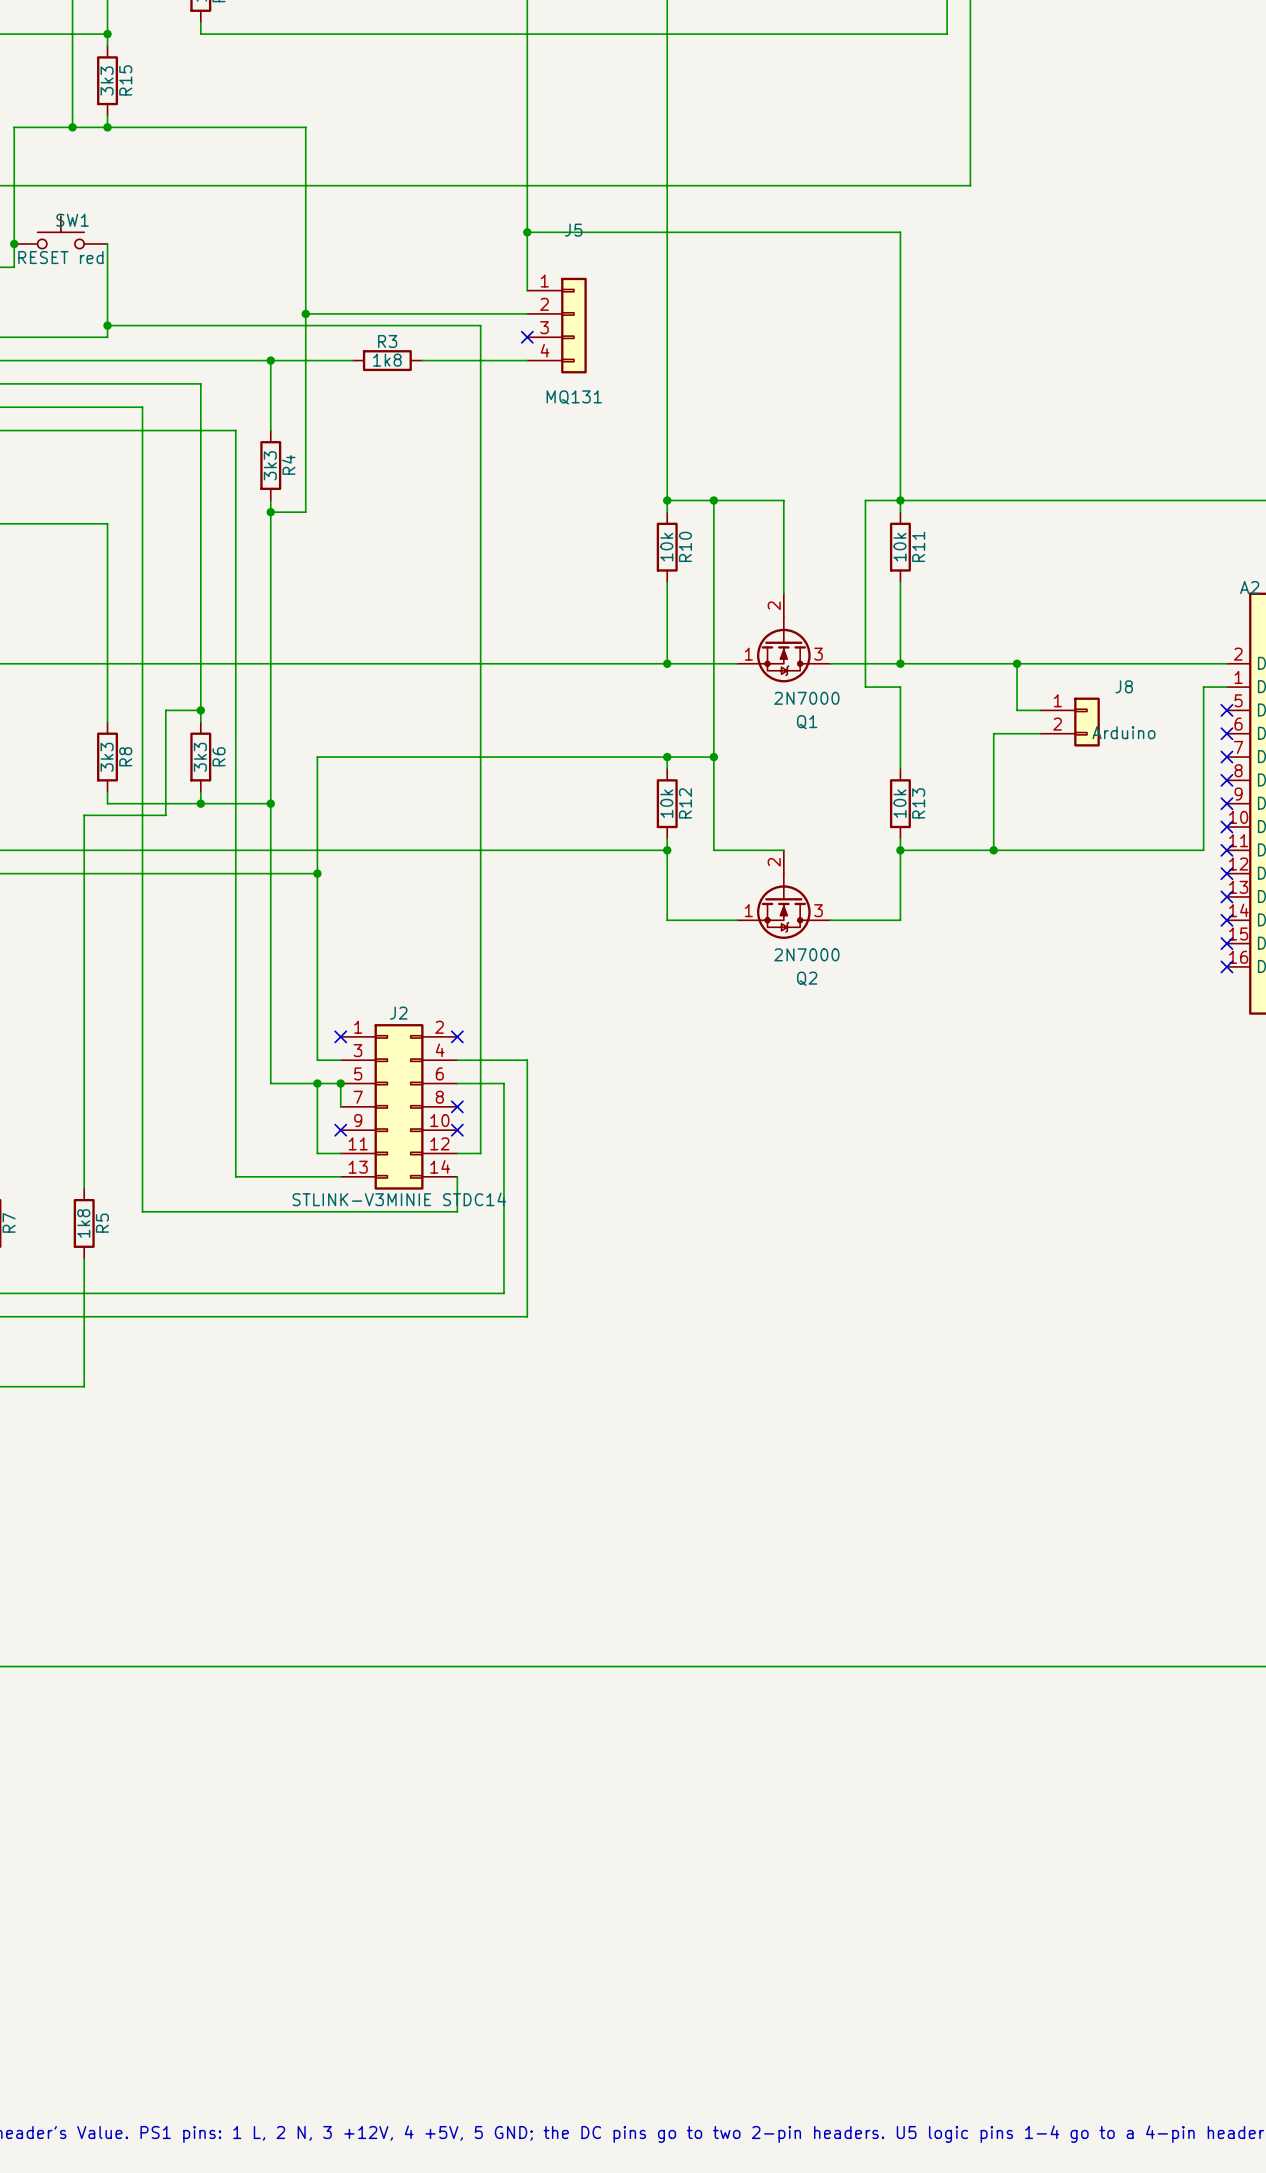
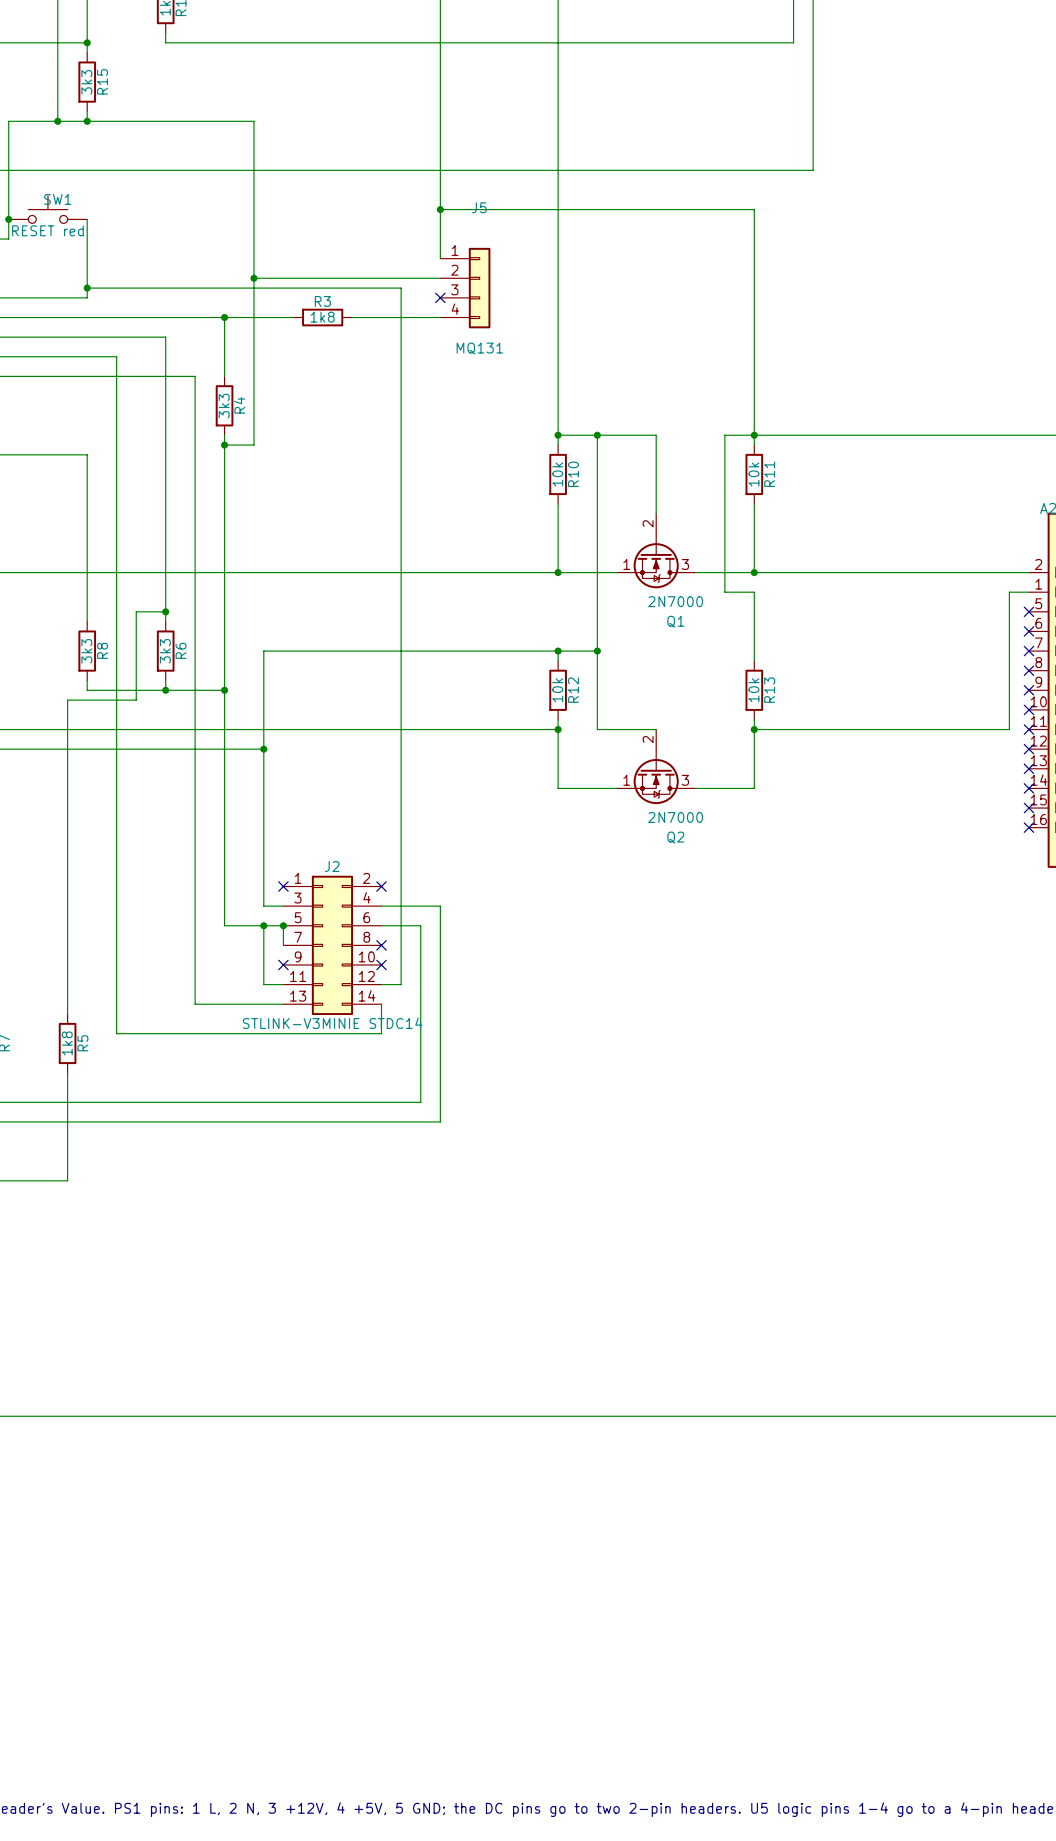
wire: (1017, 663) (1017, 710) (1040, 710) -> none
junction: (1017, 663) -> none
J8: Arduino (1070, 722) -> none
wire: (1040, 733) (993, 733) (993, 850) -> none
junction: (993, 850) -> none

